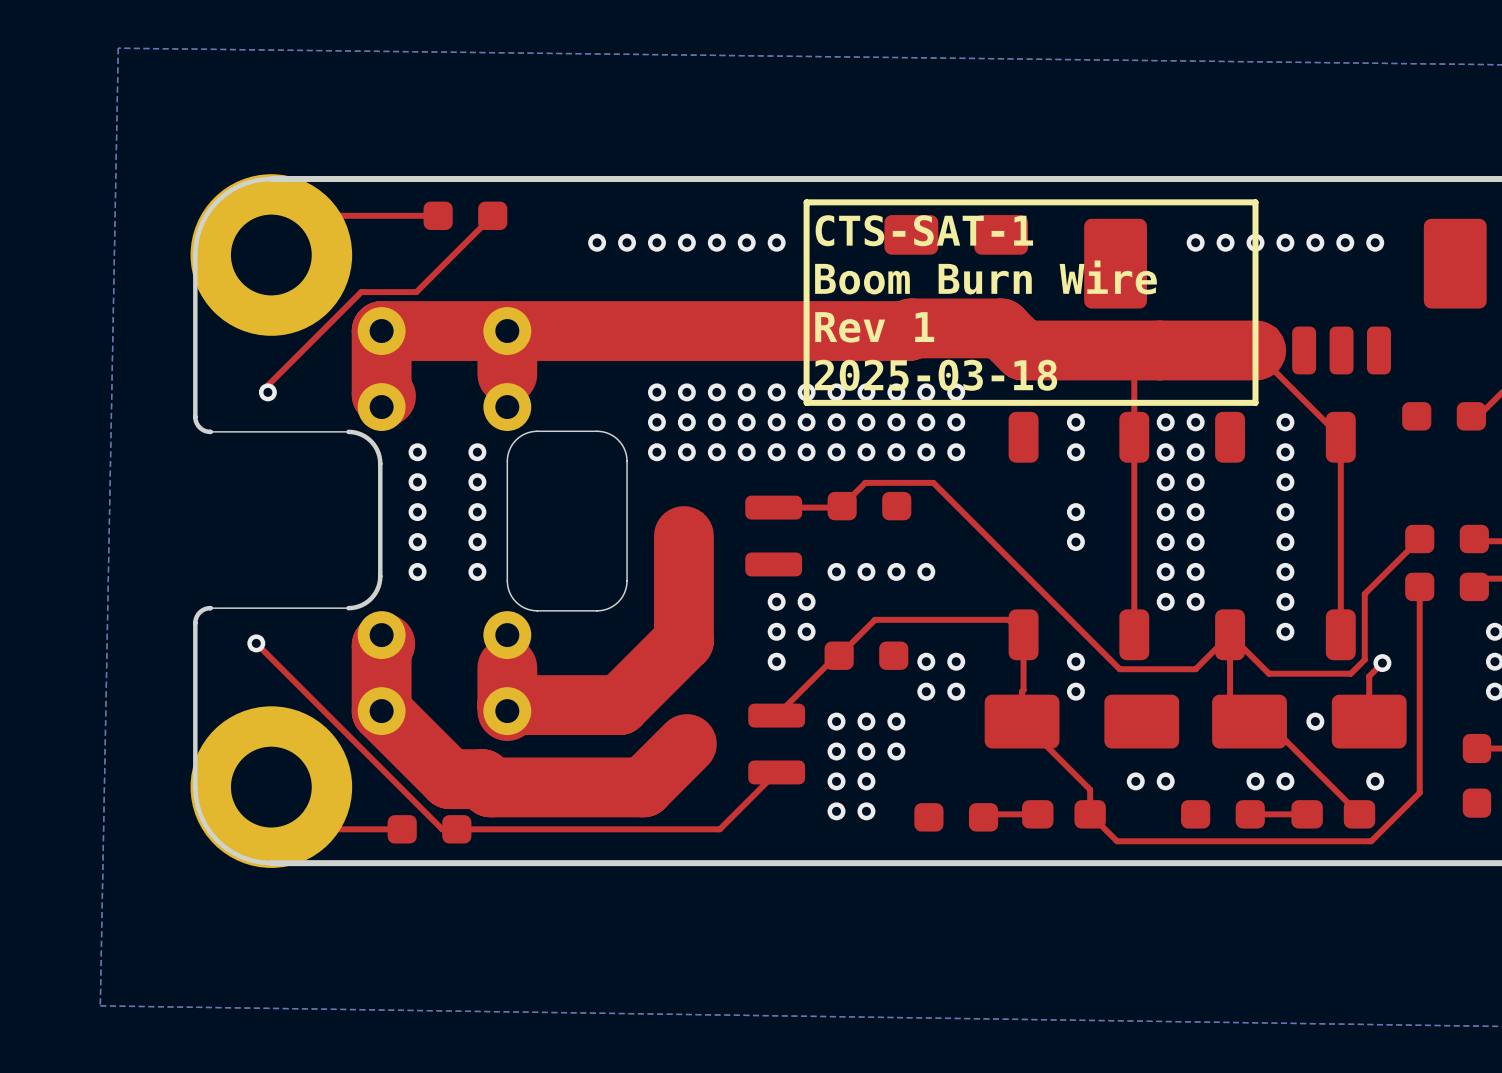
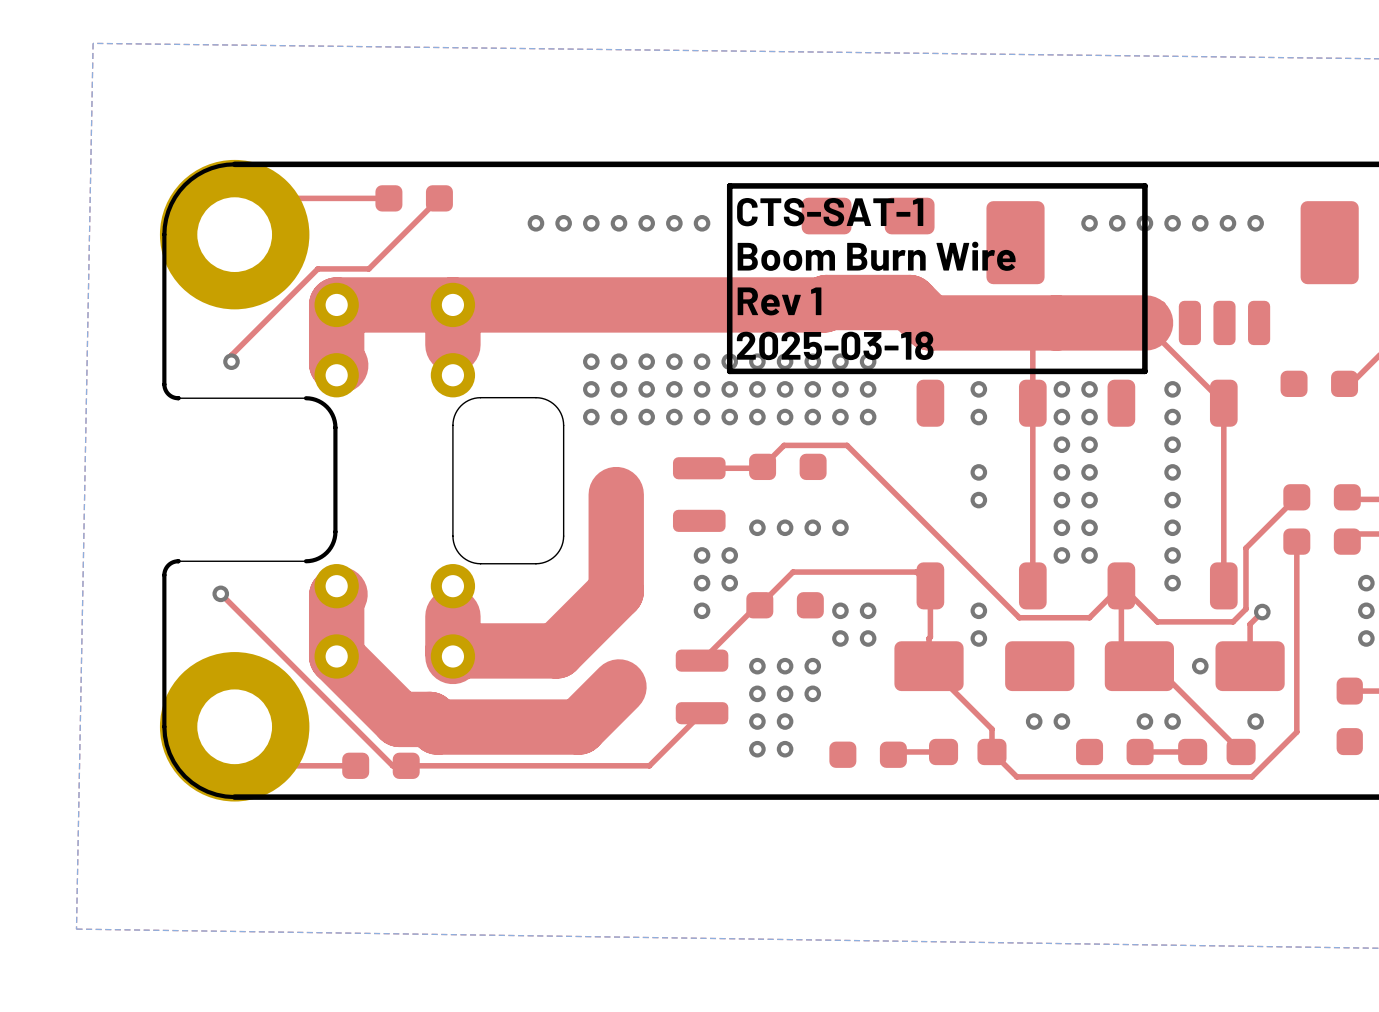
via: (417, 452) -> none
via: (477, 452) -> none
via: (417, 482) -> none
via: (477, 482) -> none
via: (417, 512) -> none
via: (477, 512) -> none
via: (417, 542) -> none
via: (477, 542) -> none
via: (417, 571) -> none
via: (477, 571) -> none

